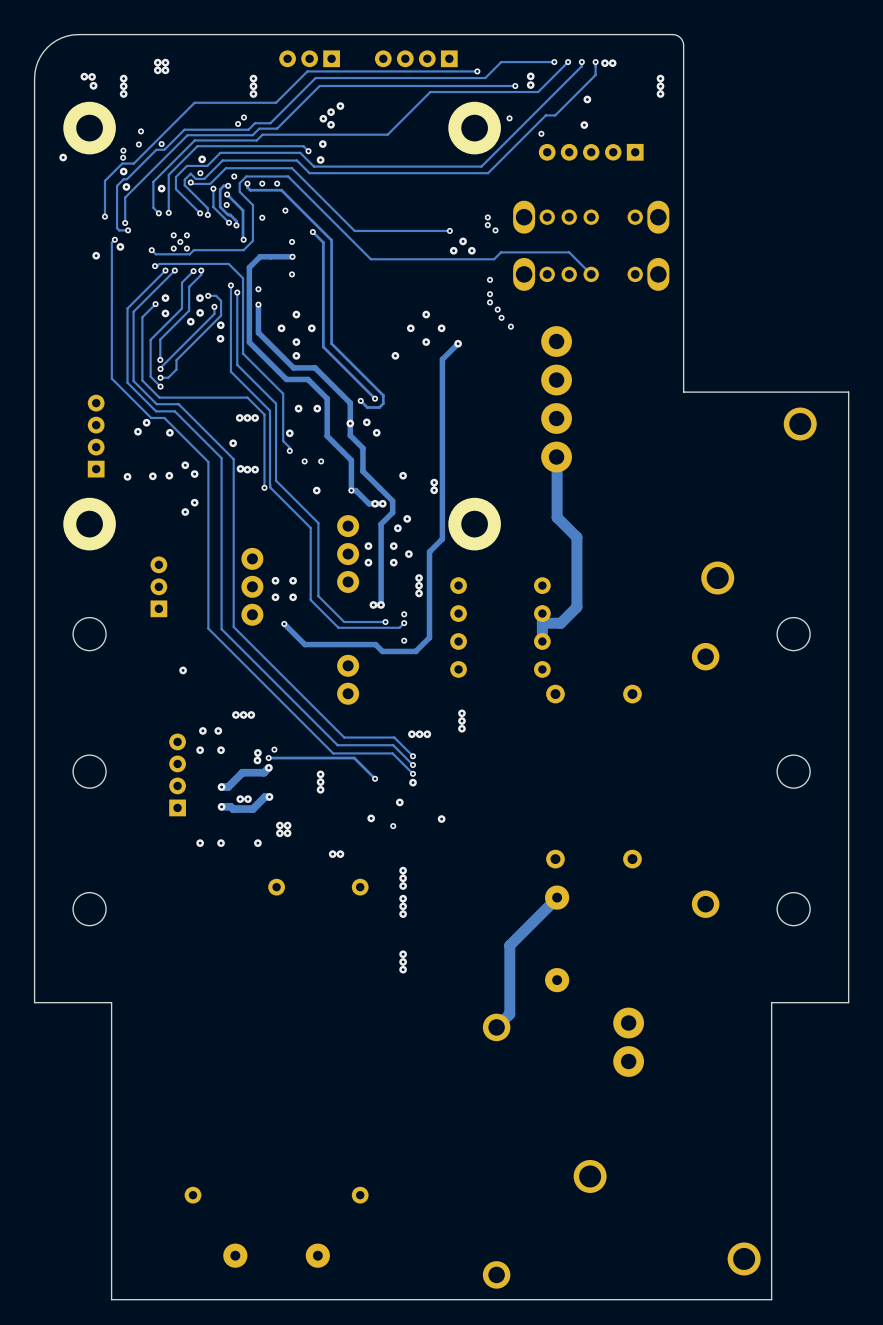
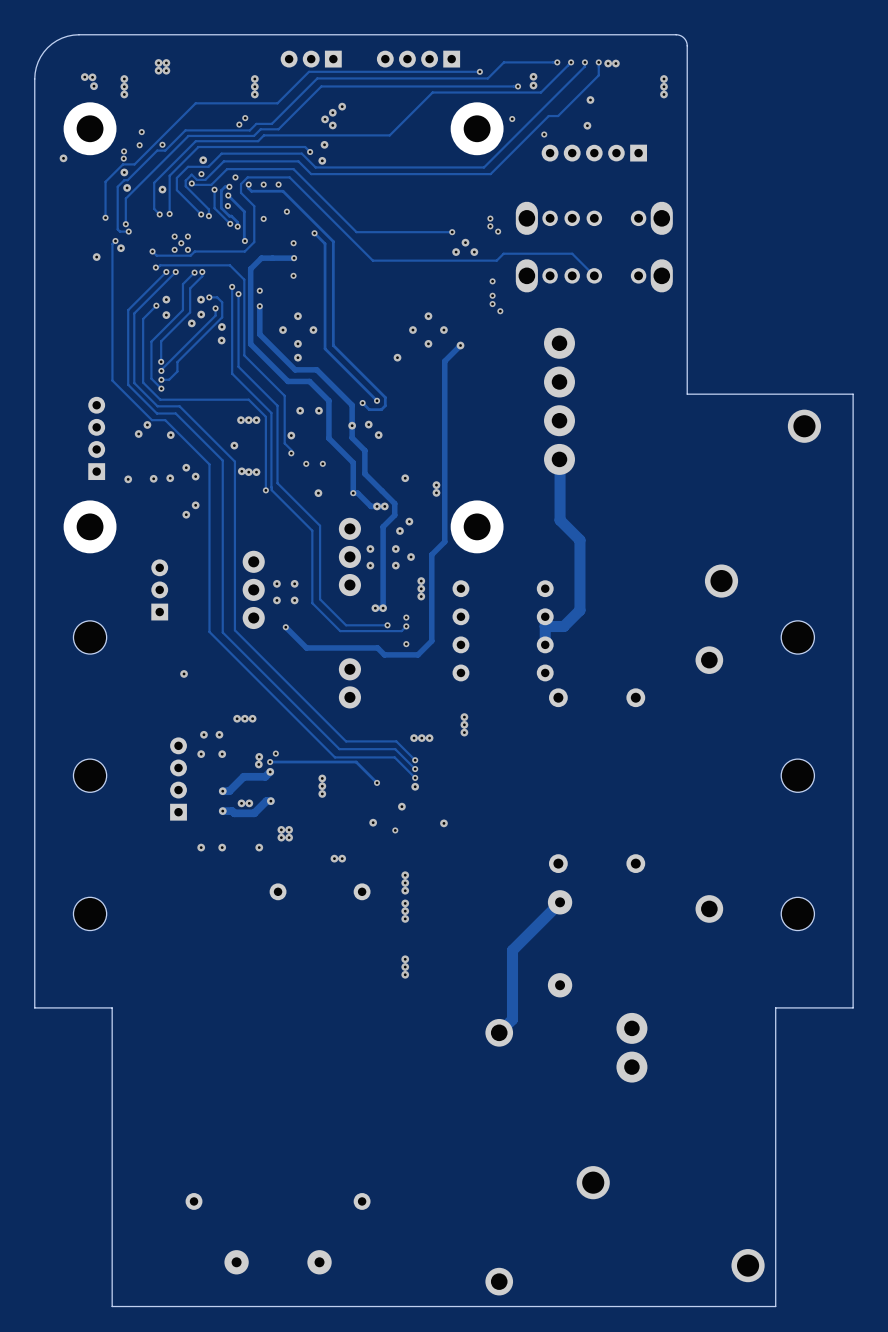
via: (501, 317) -> none
via: (510, 326) -> none

